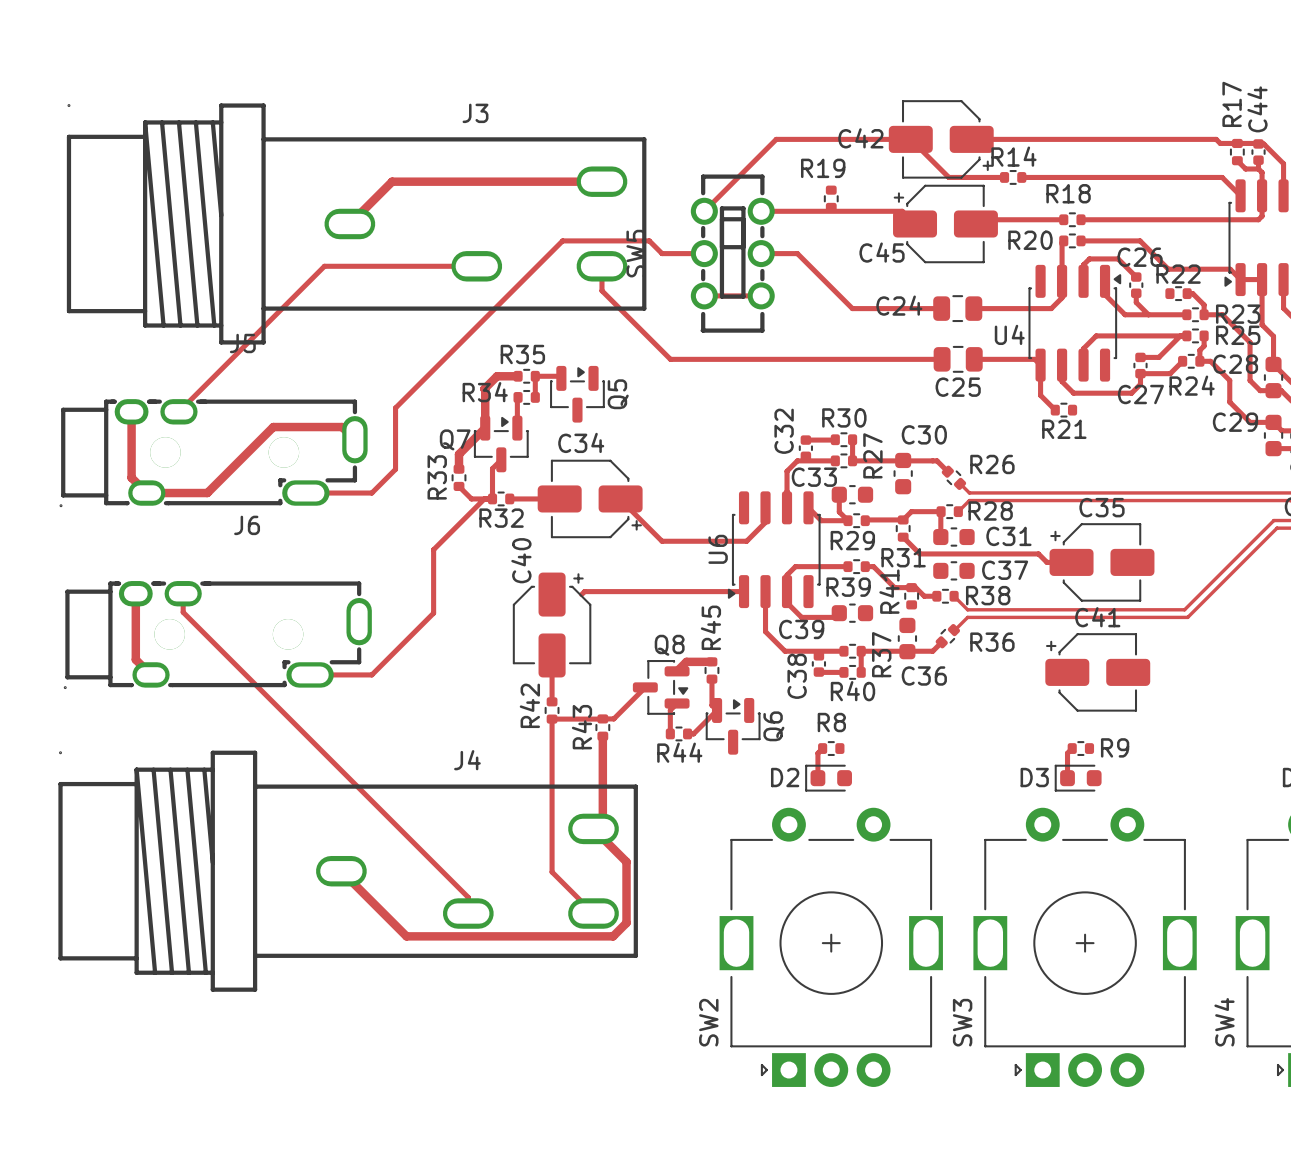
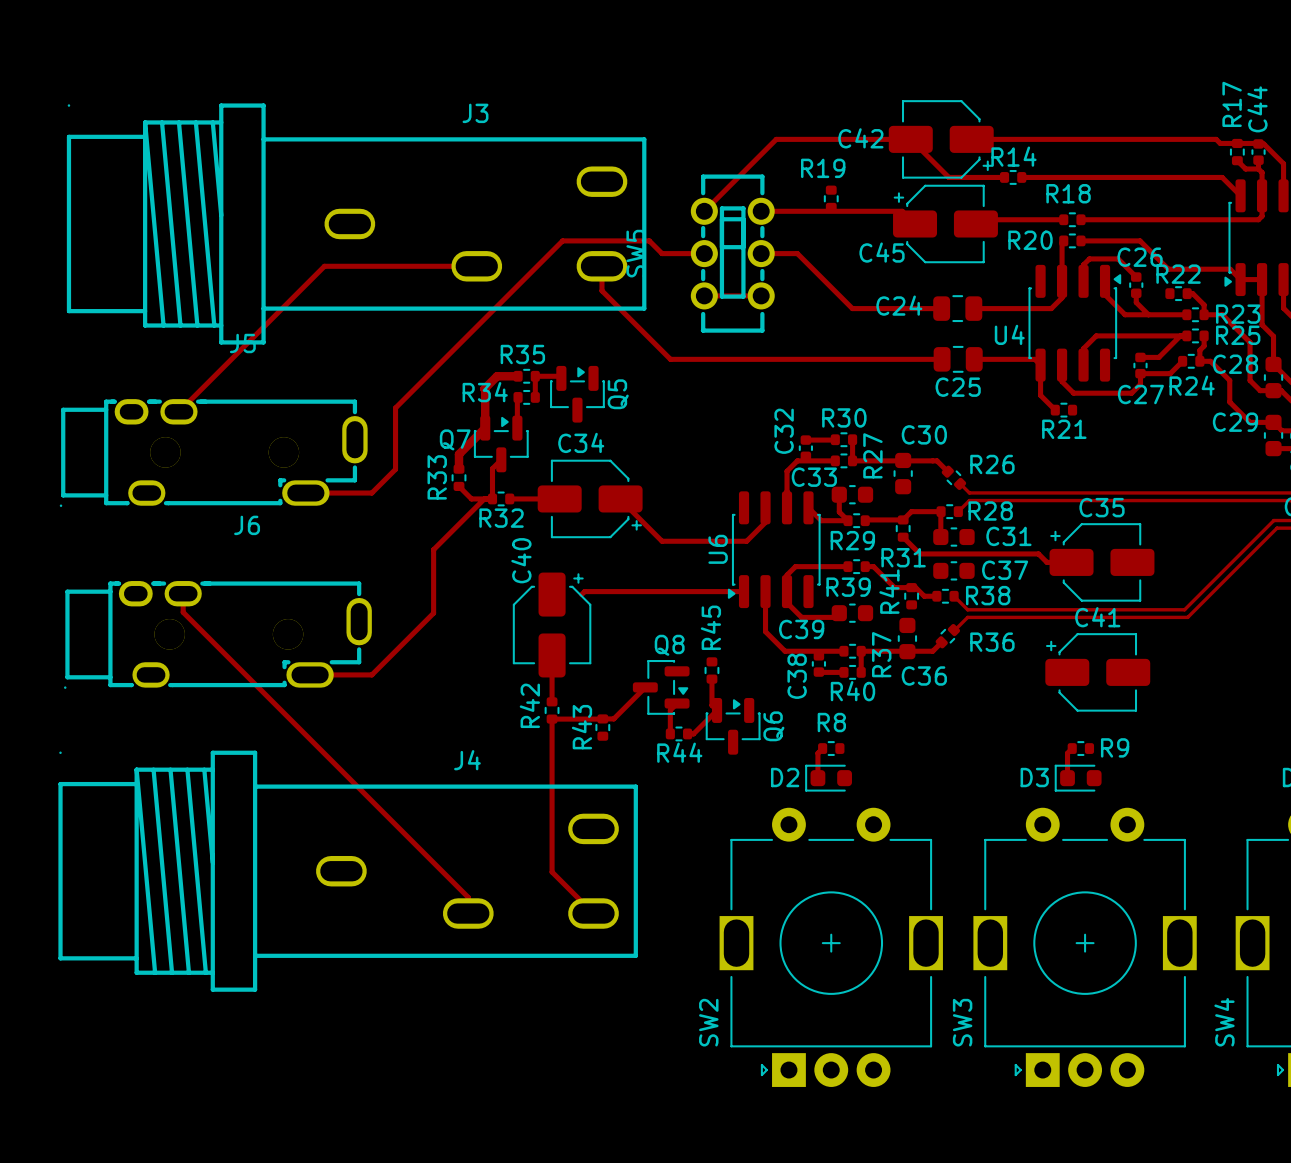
track: (601, 181) (392, 181) (349, 223) -> none
track: (131, 411) (131, 477) (146, 493) (207, 493) (273, 427) (342, 427) (354, 439) -> none
track: (135, 593) (135, 659) (151, 674) -> none
track: (711, 661) (686, 661) (677, 671) -> none
track: (602, 736) (602, 819) -> none
track: (593, 828) (626, 861) (626, 922) (613, 936) (406, 936) (341, 871) -> none

